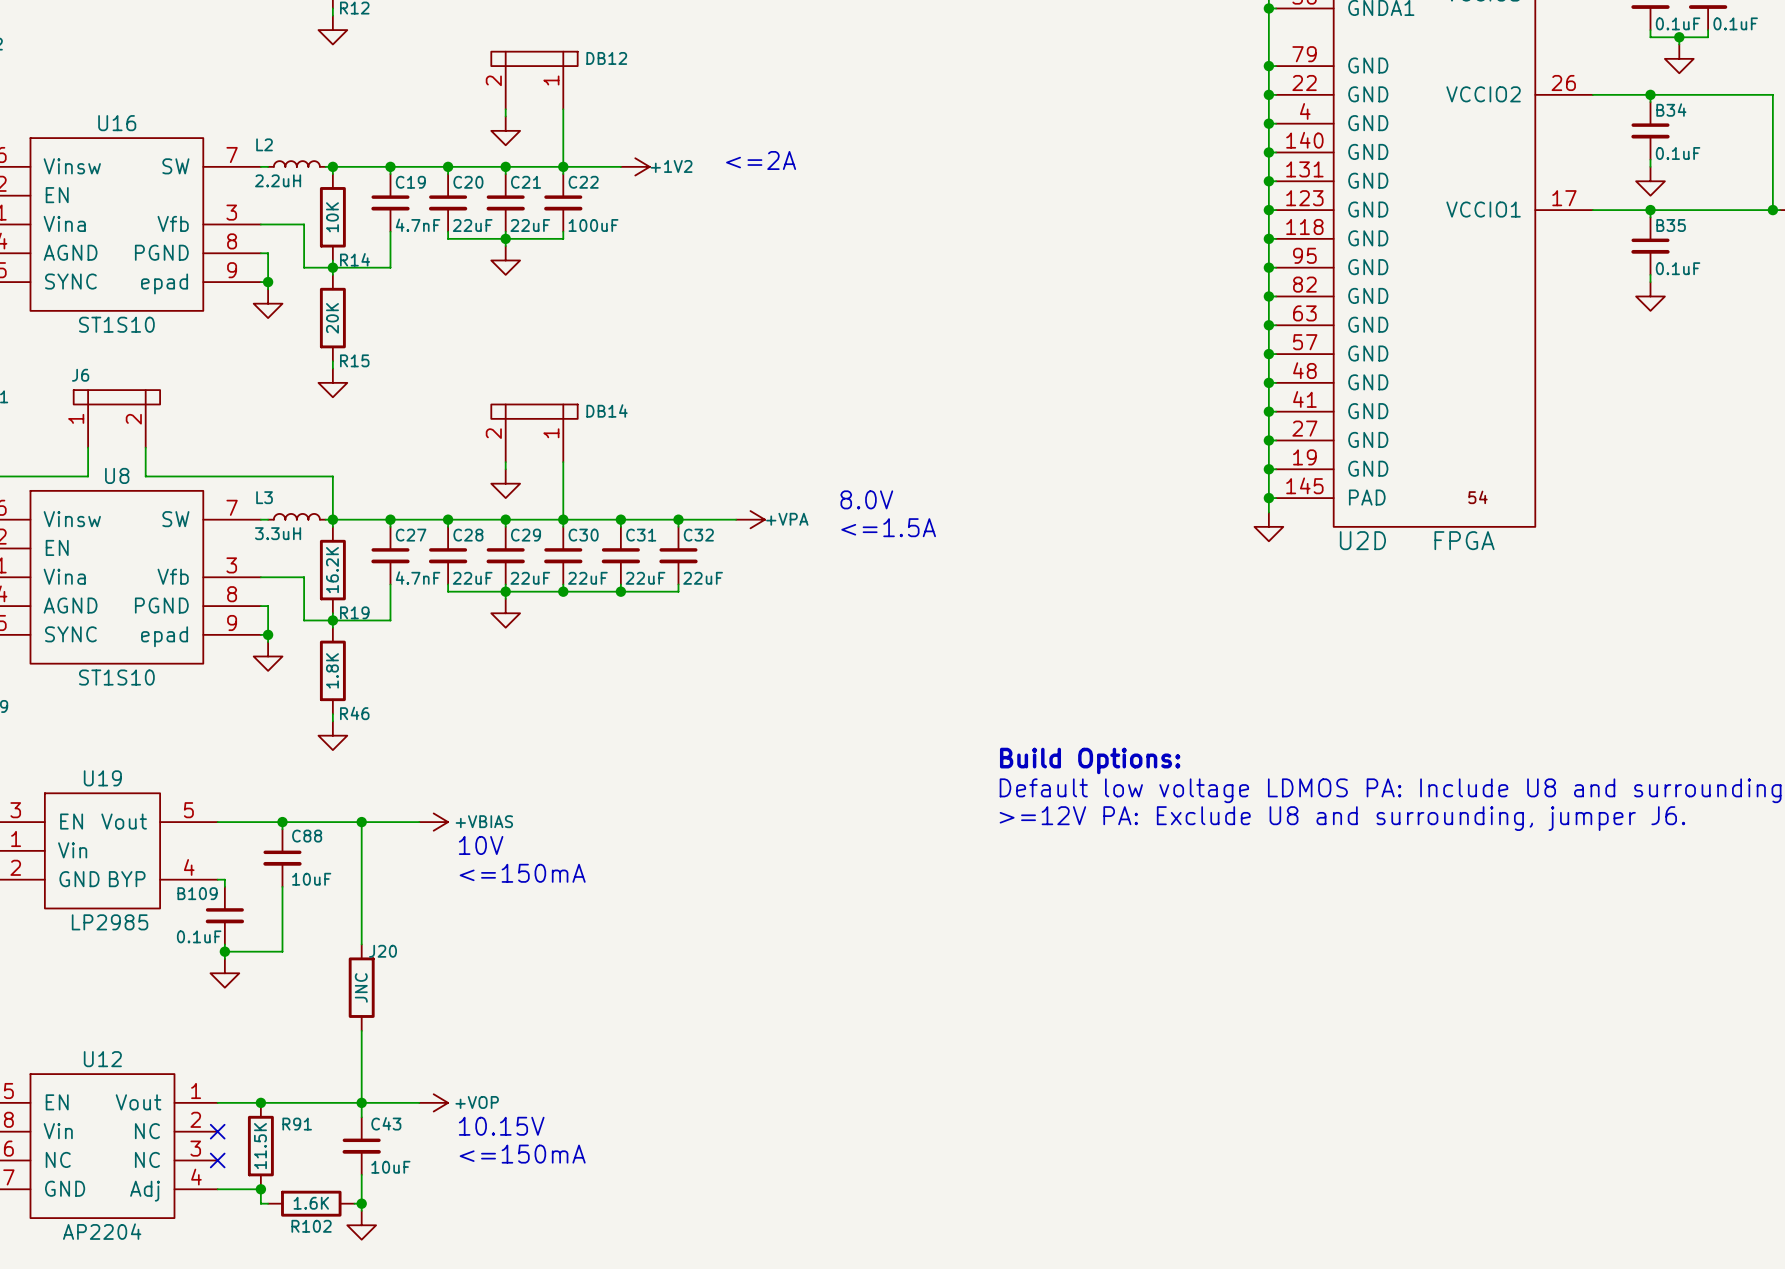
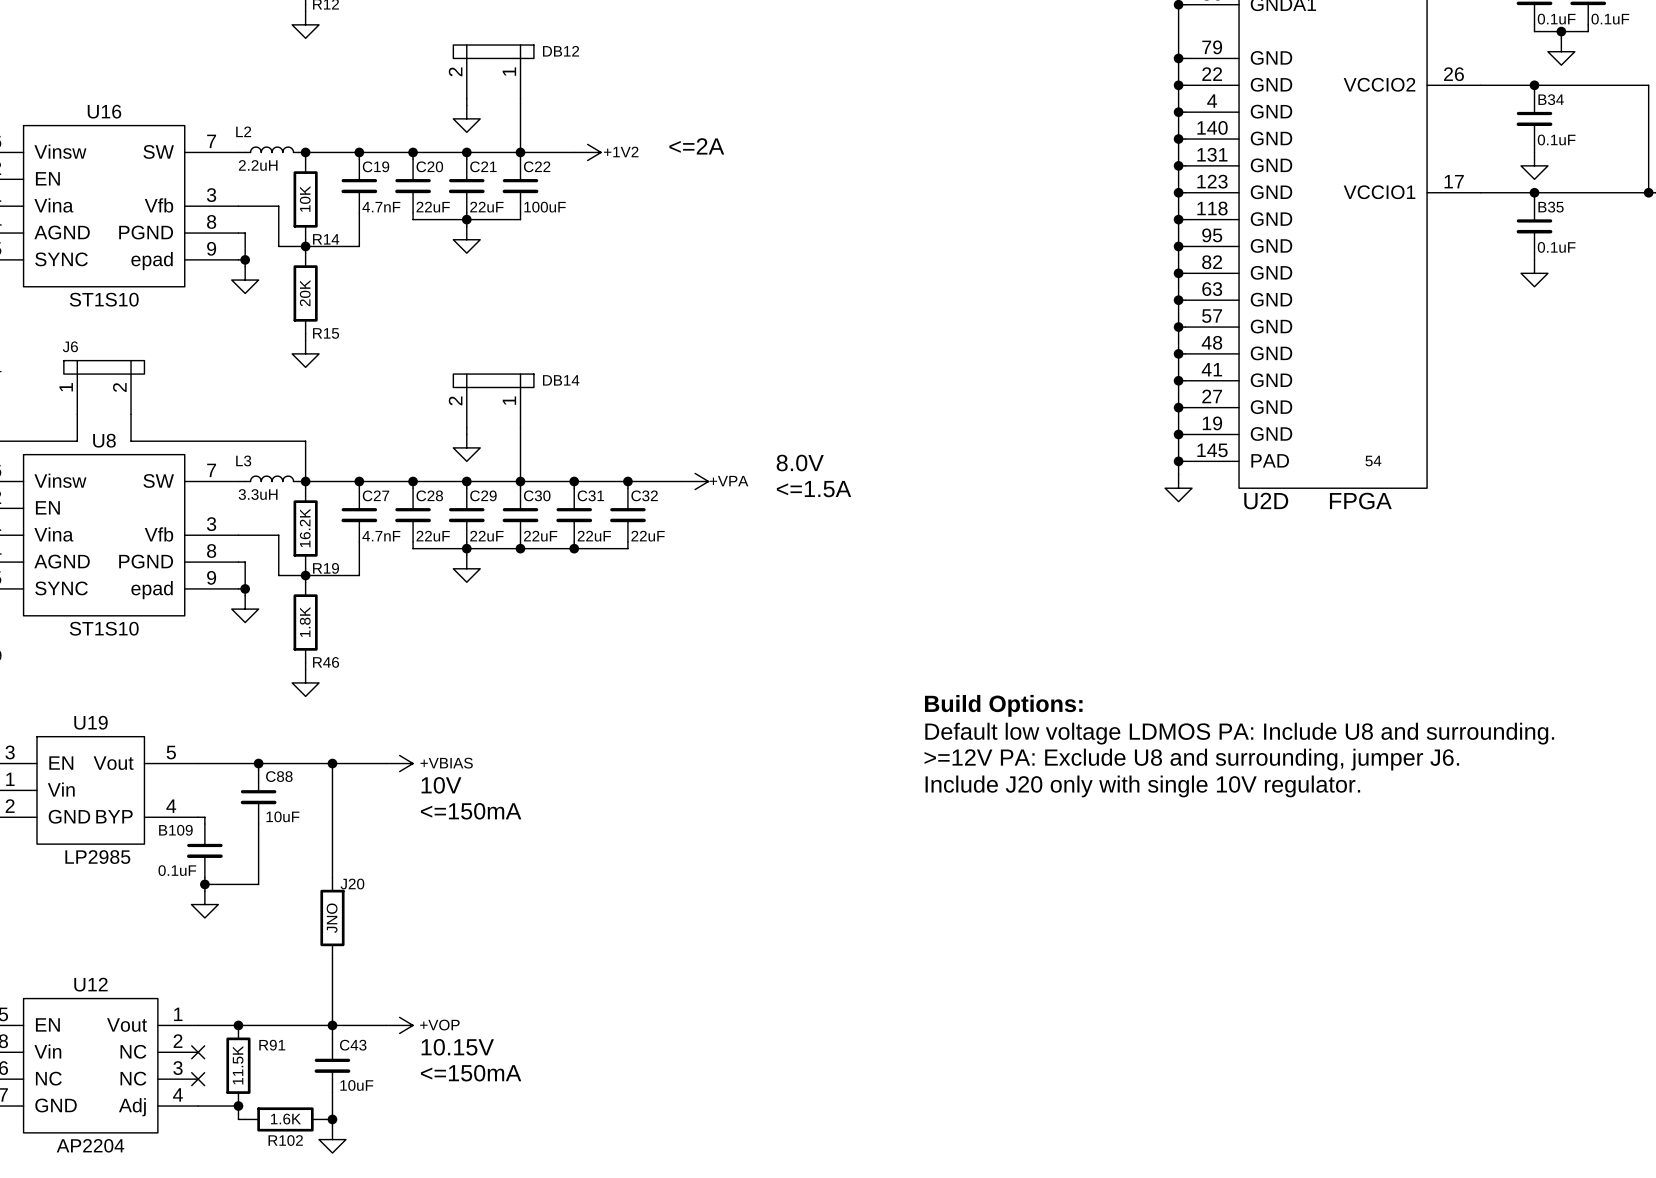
text: none -> Include J20 only with single 10V regulator. (1142, 786)
J20 value: JNC (361, 987) -> JNO (332, 918)

